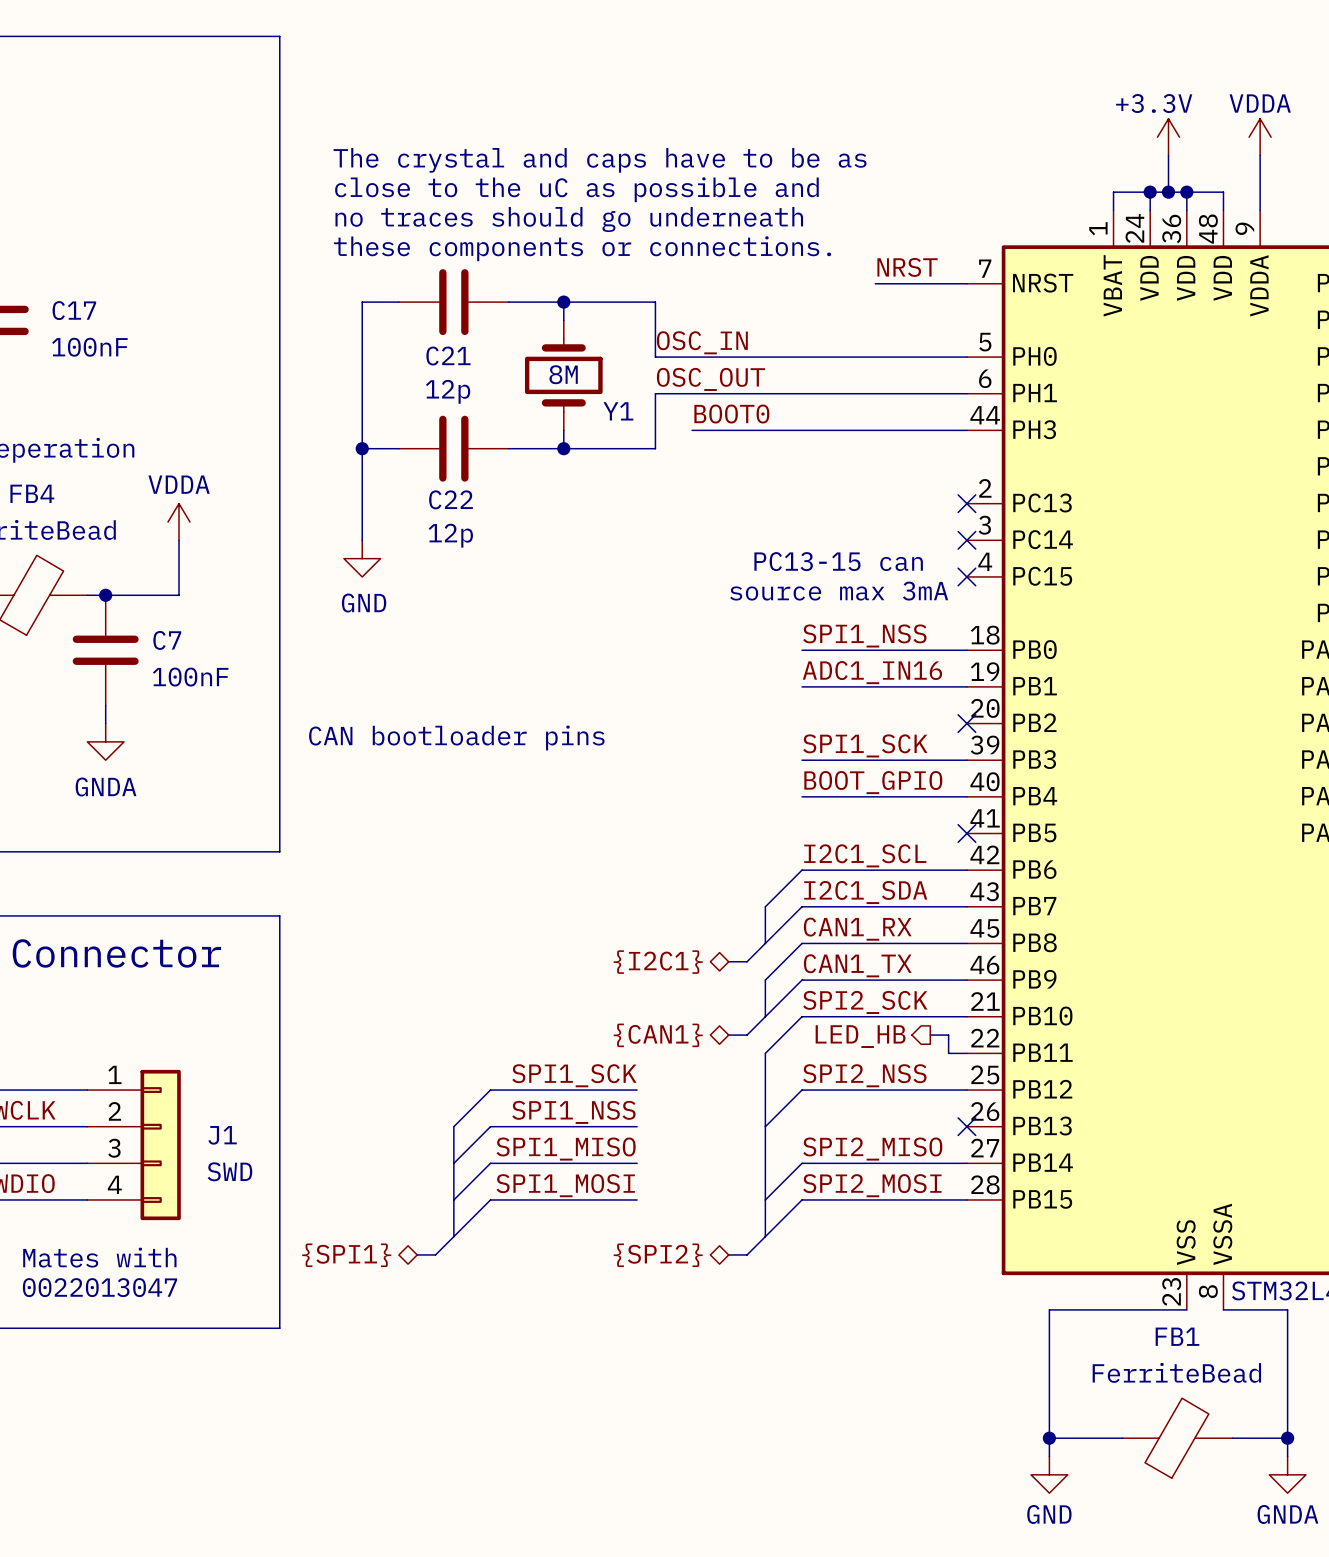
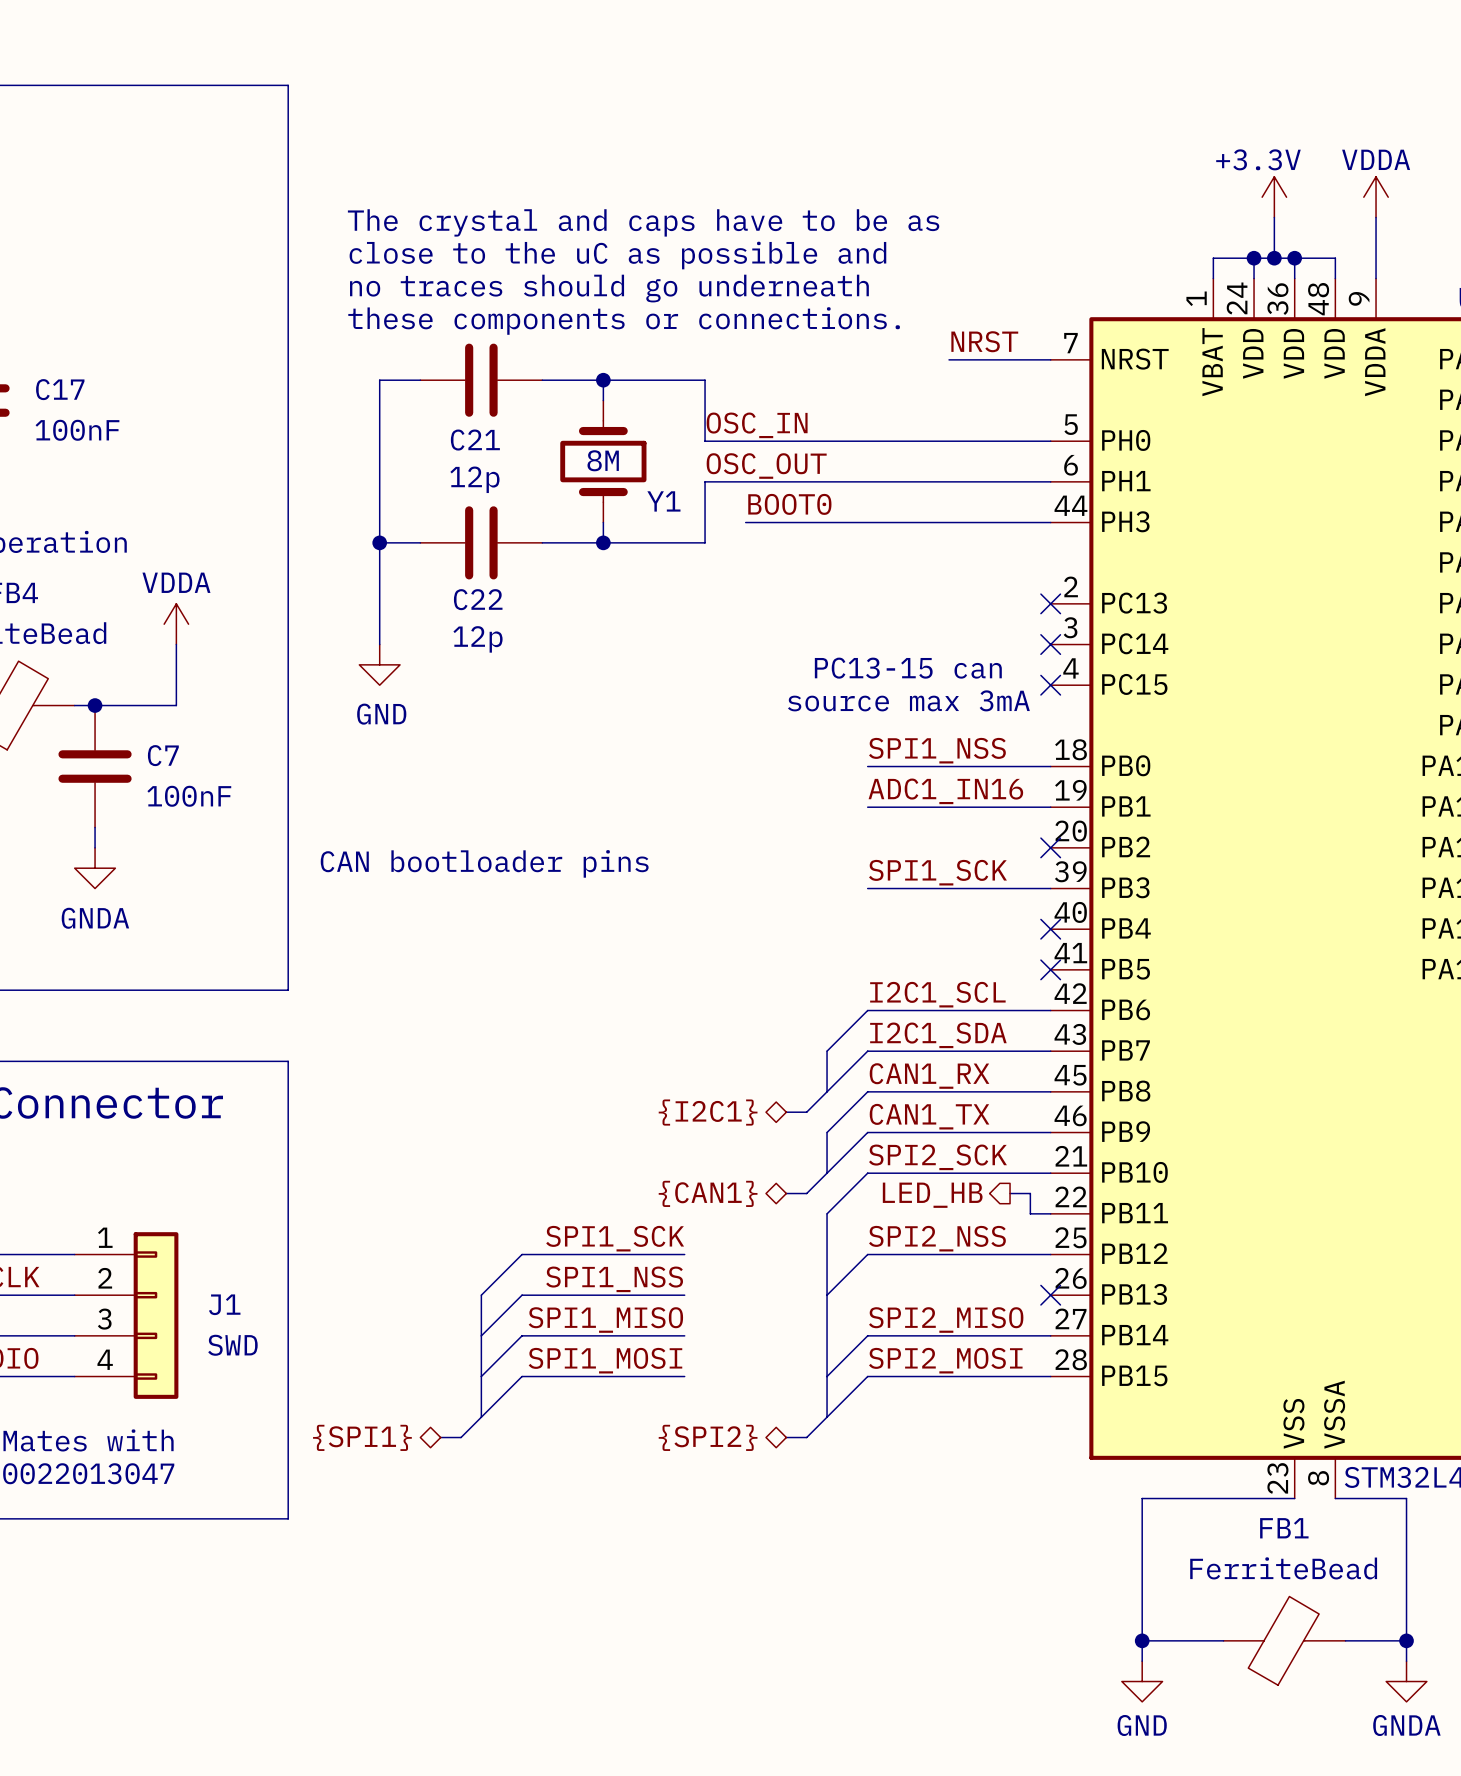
label: BOOT_GPIO (873, 782) -> none
wire: (802, 796) (966, 796) -> none
no-connect mark: none -> (1050, 929)

